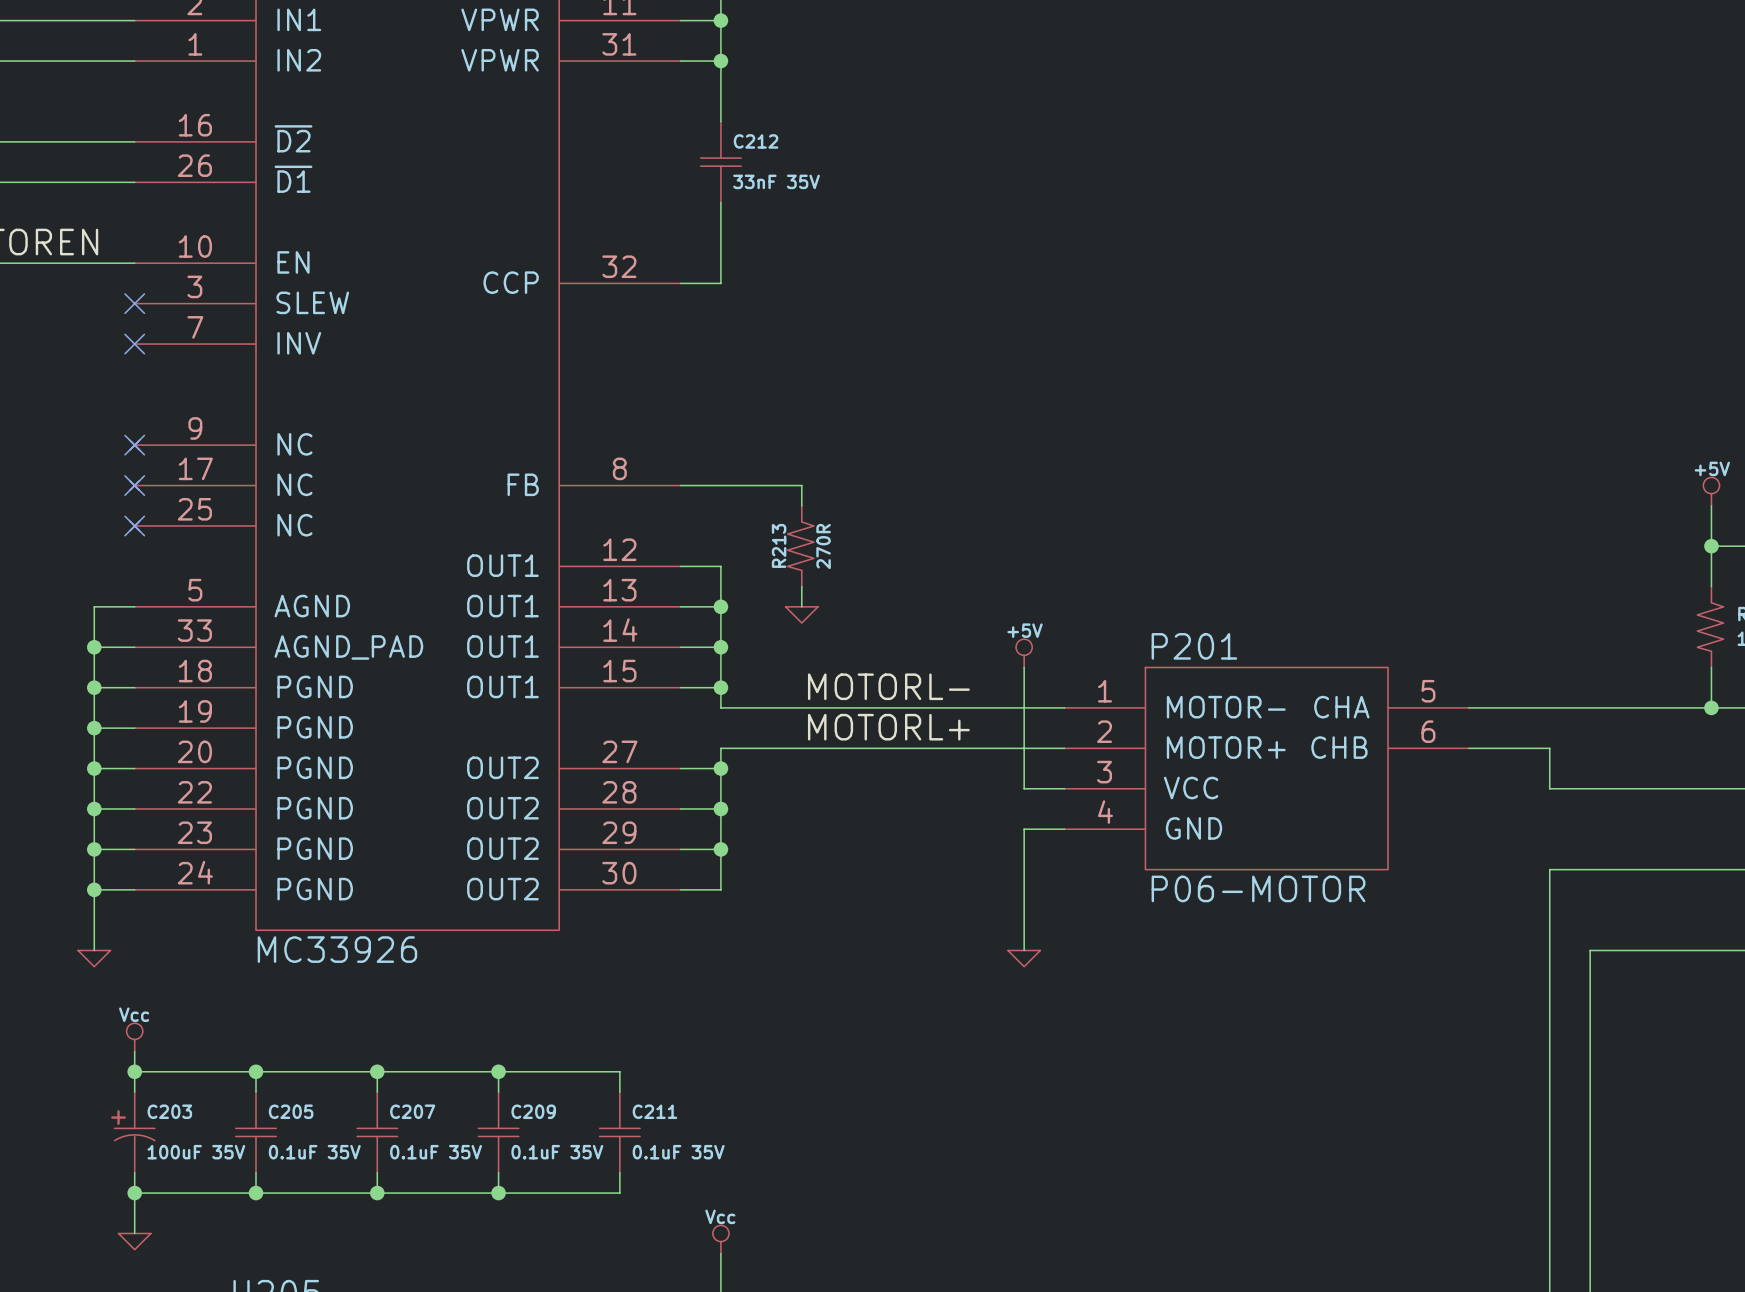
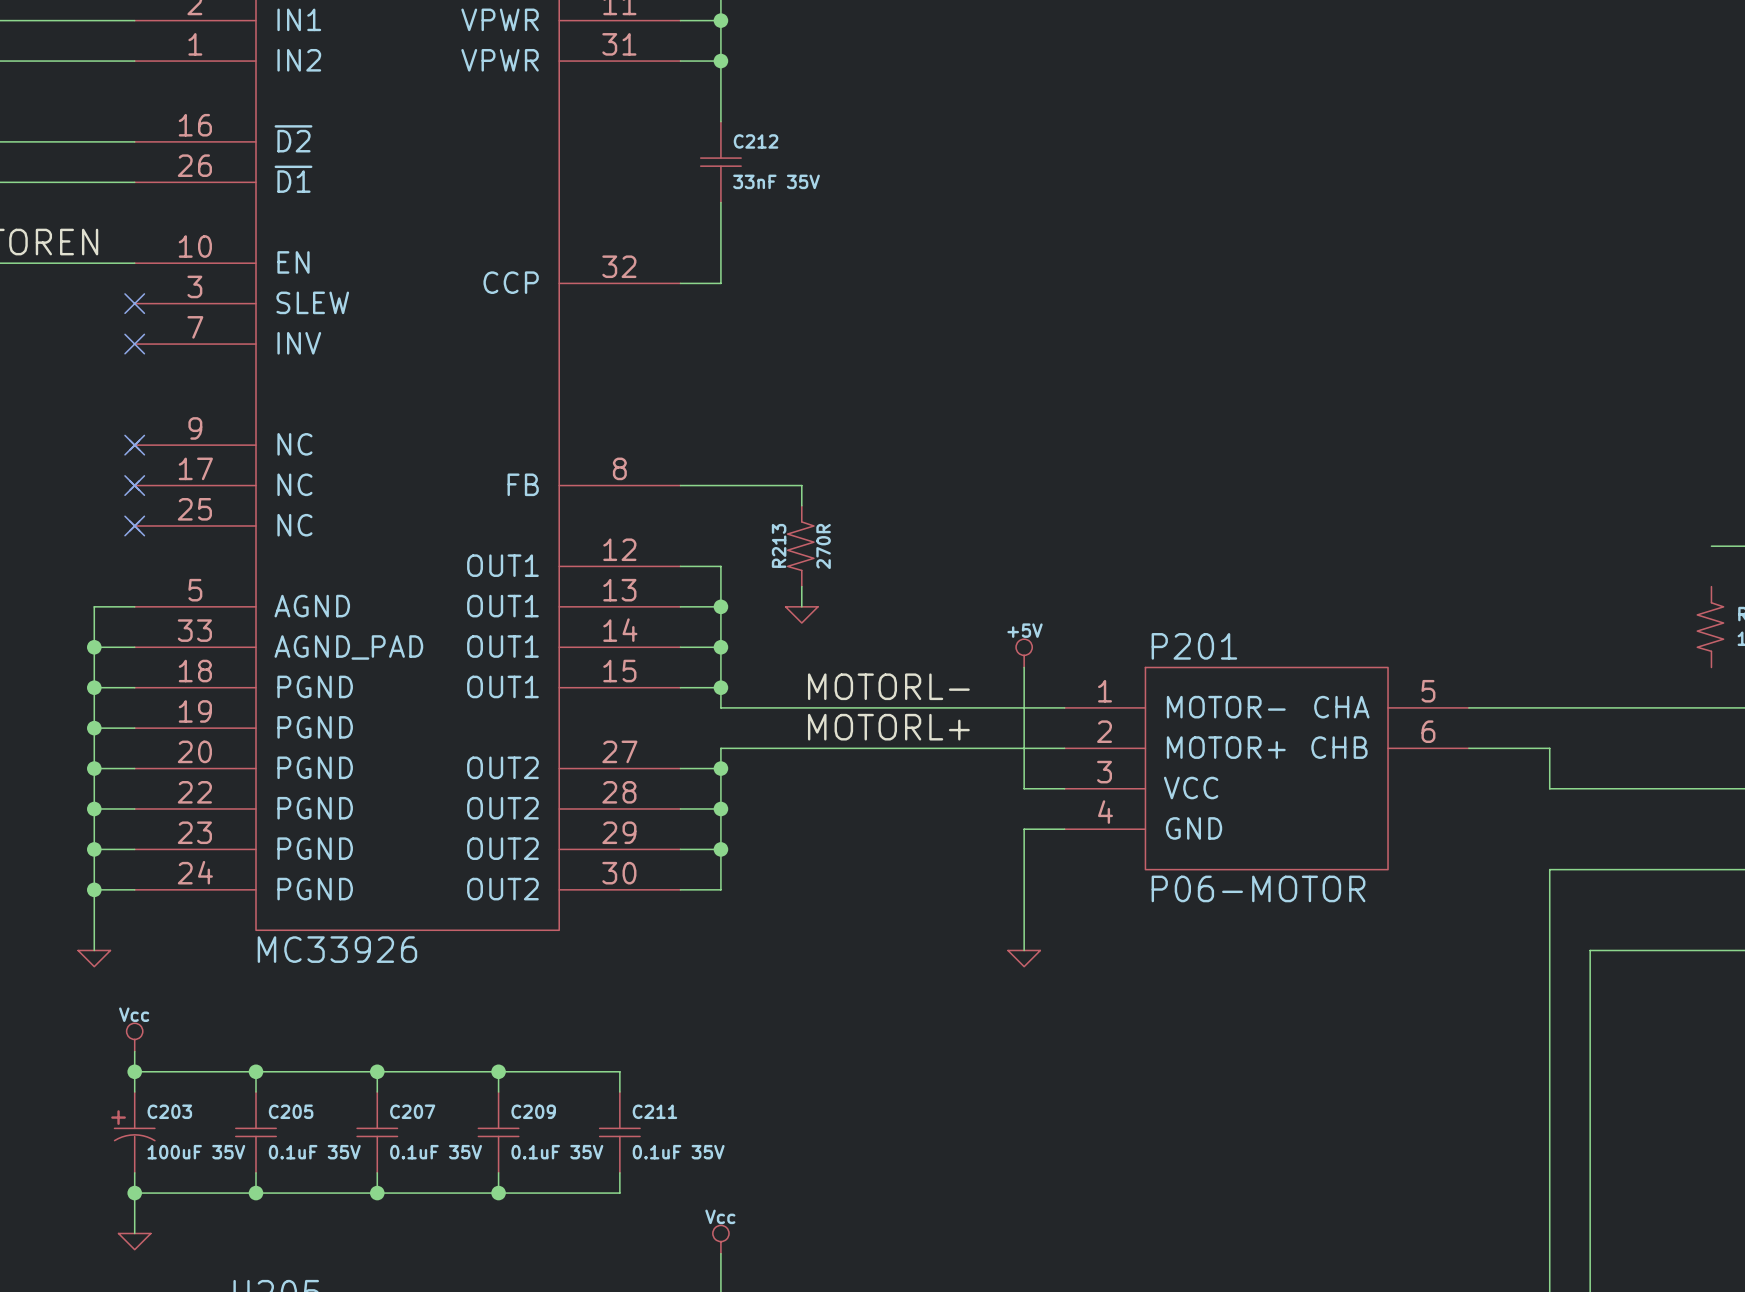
power symbol: +5V (1711, 491) -> none
wire: (1711, 505) (1711, 586) -> none
junction: (1711, 546) -> none
wire: (1711, 667) (1711, 707) -> none
junction: (1711, 707) -> none

